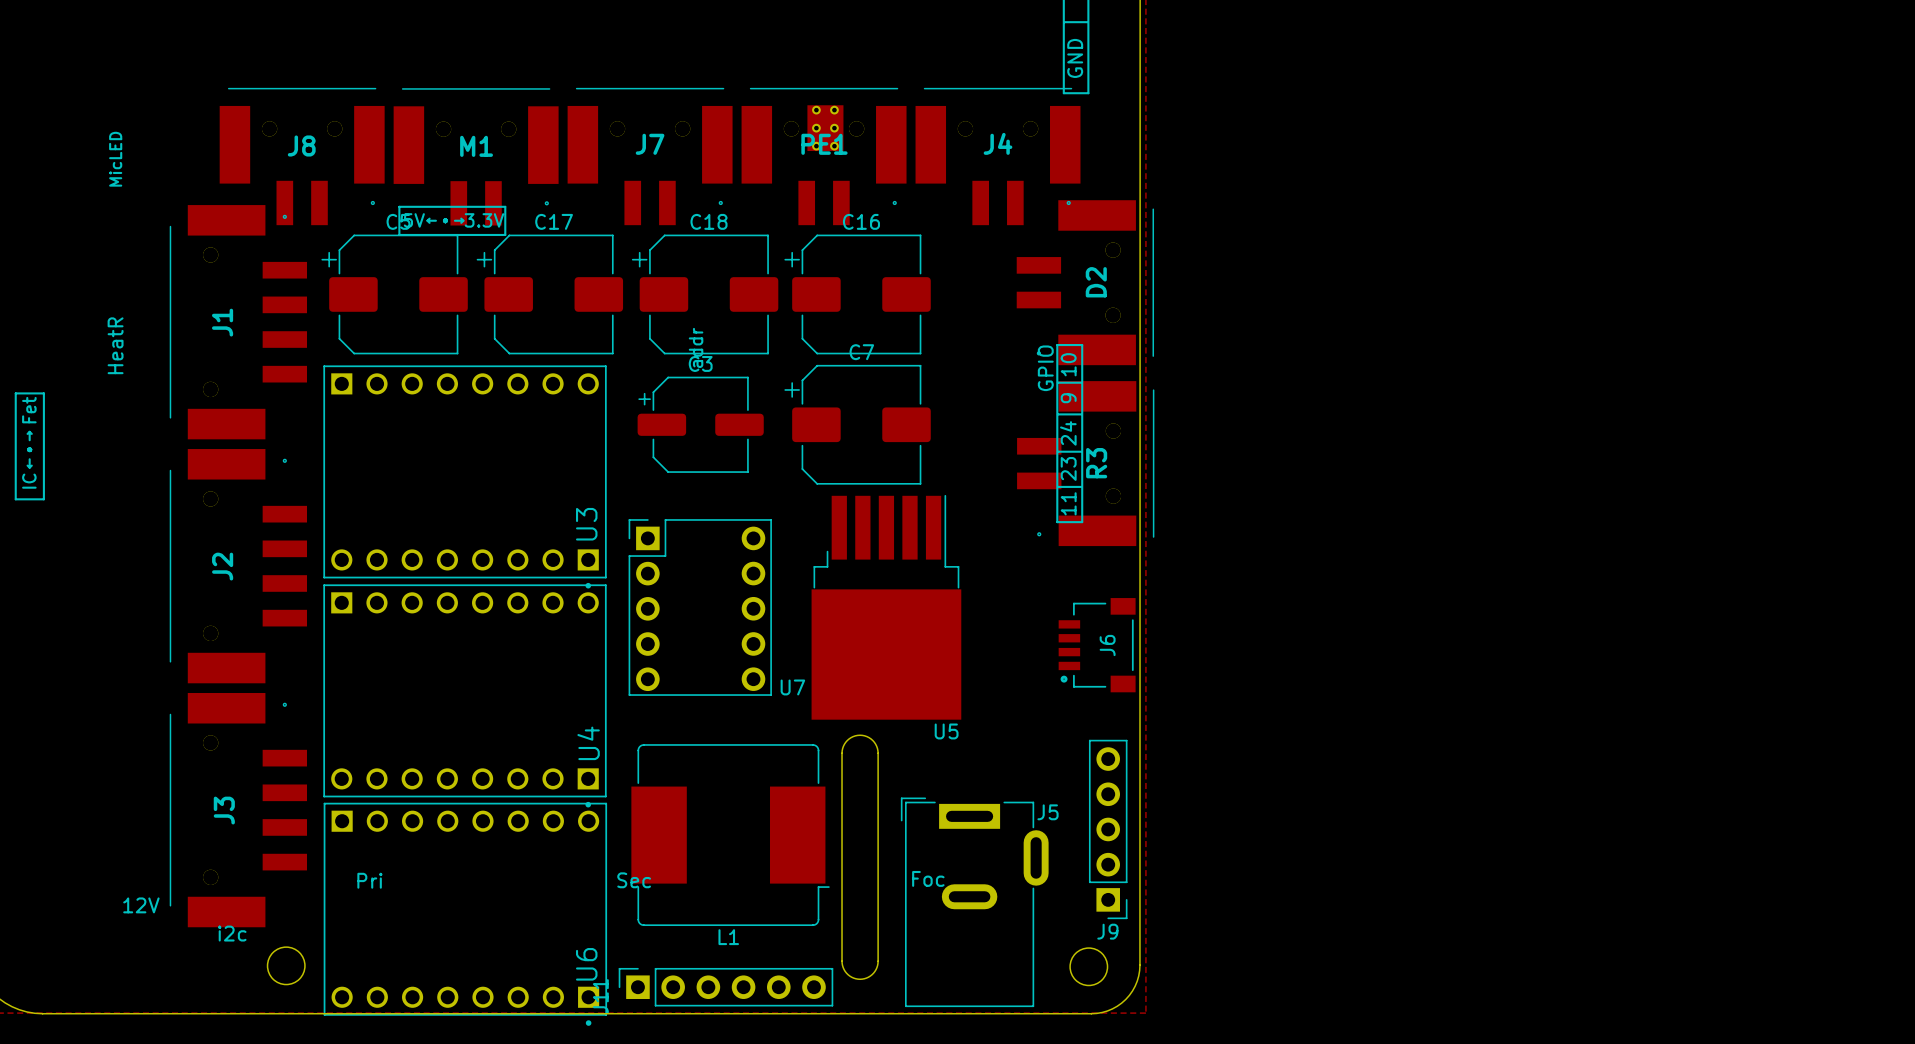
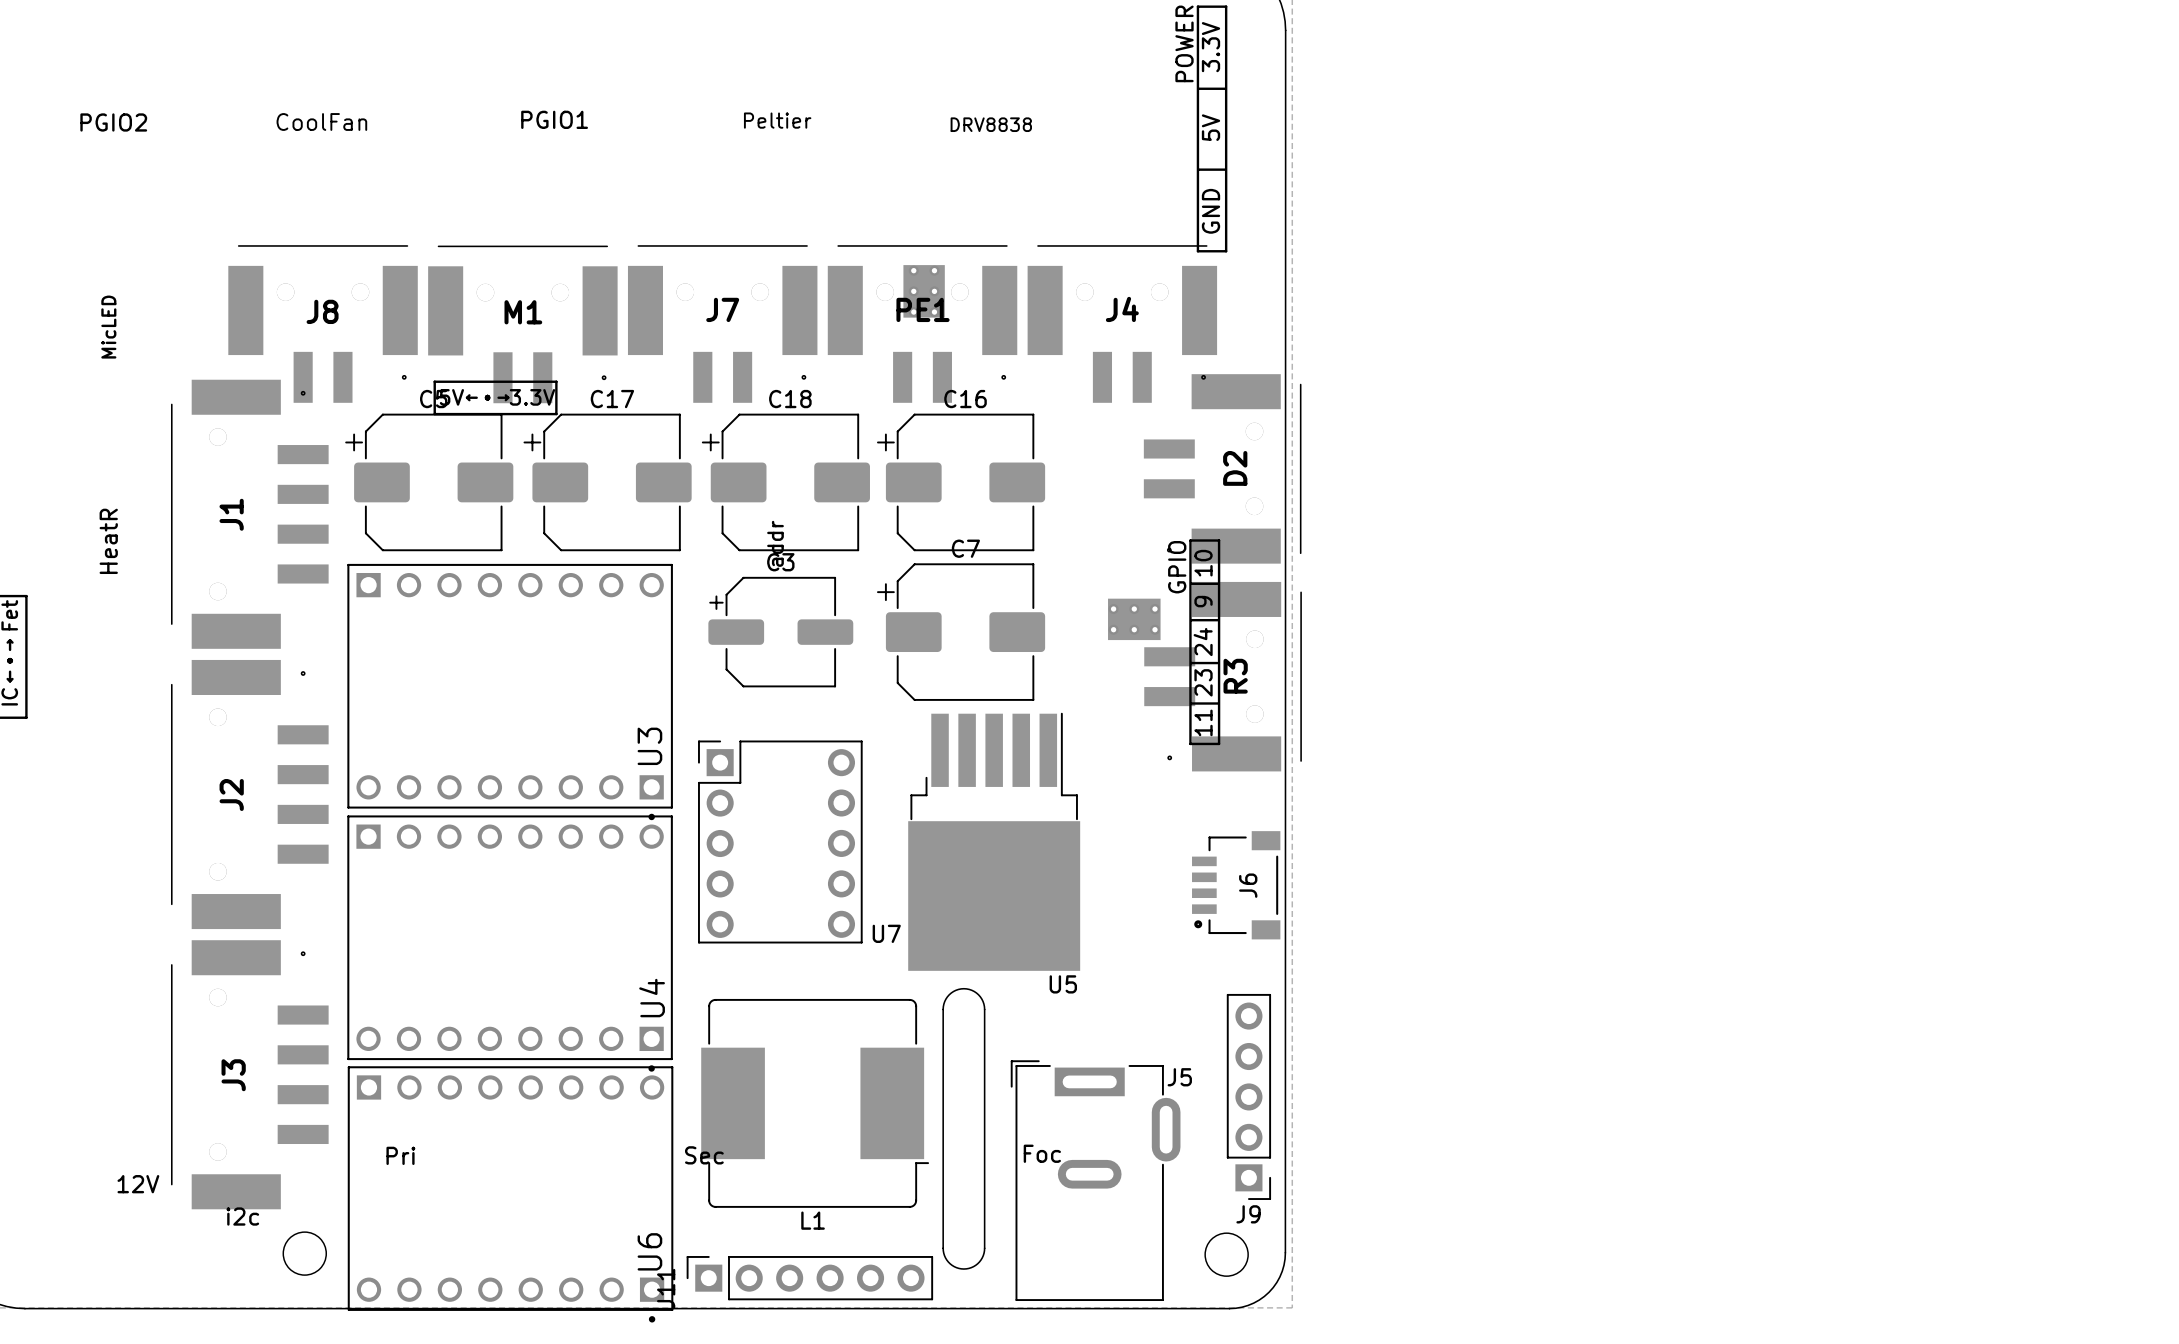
part: none -> (1134, 619)

